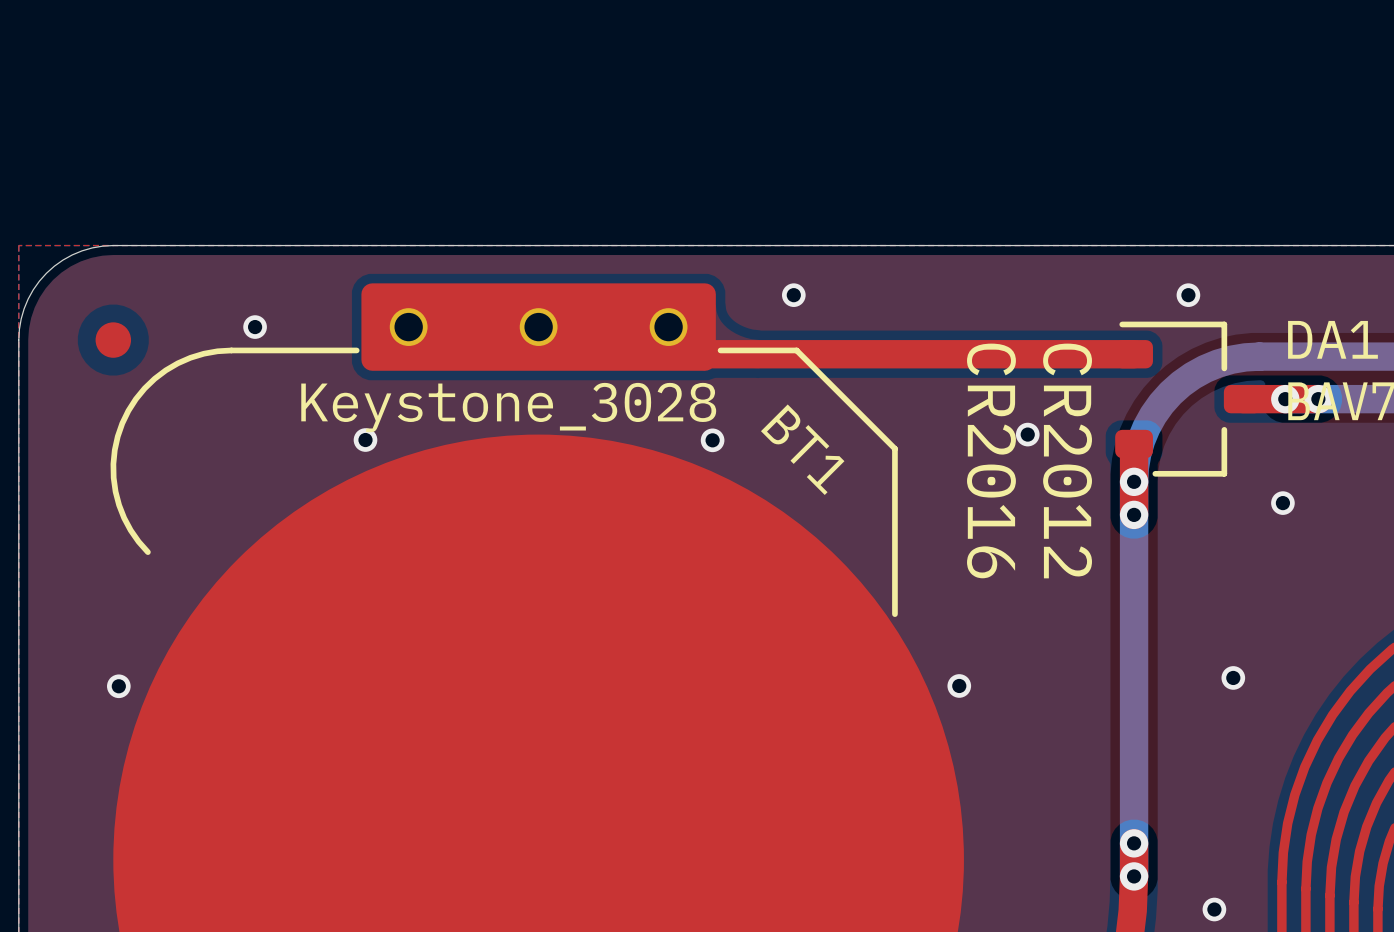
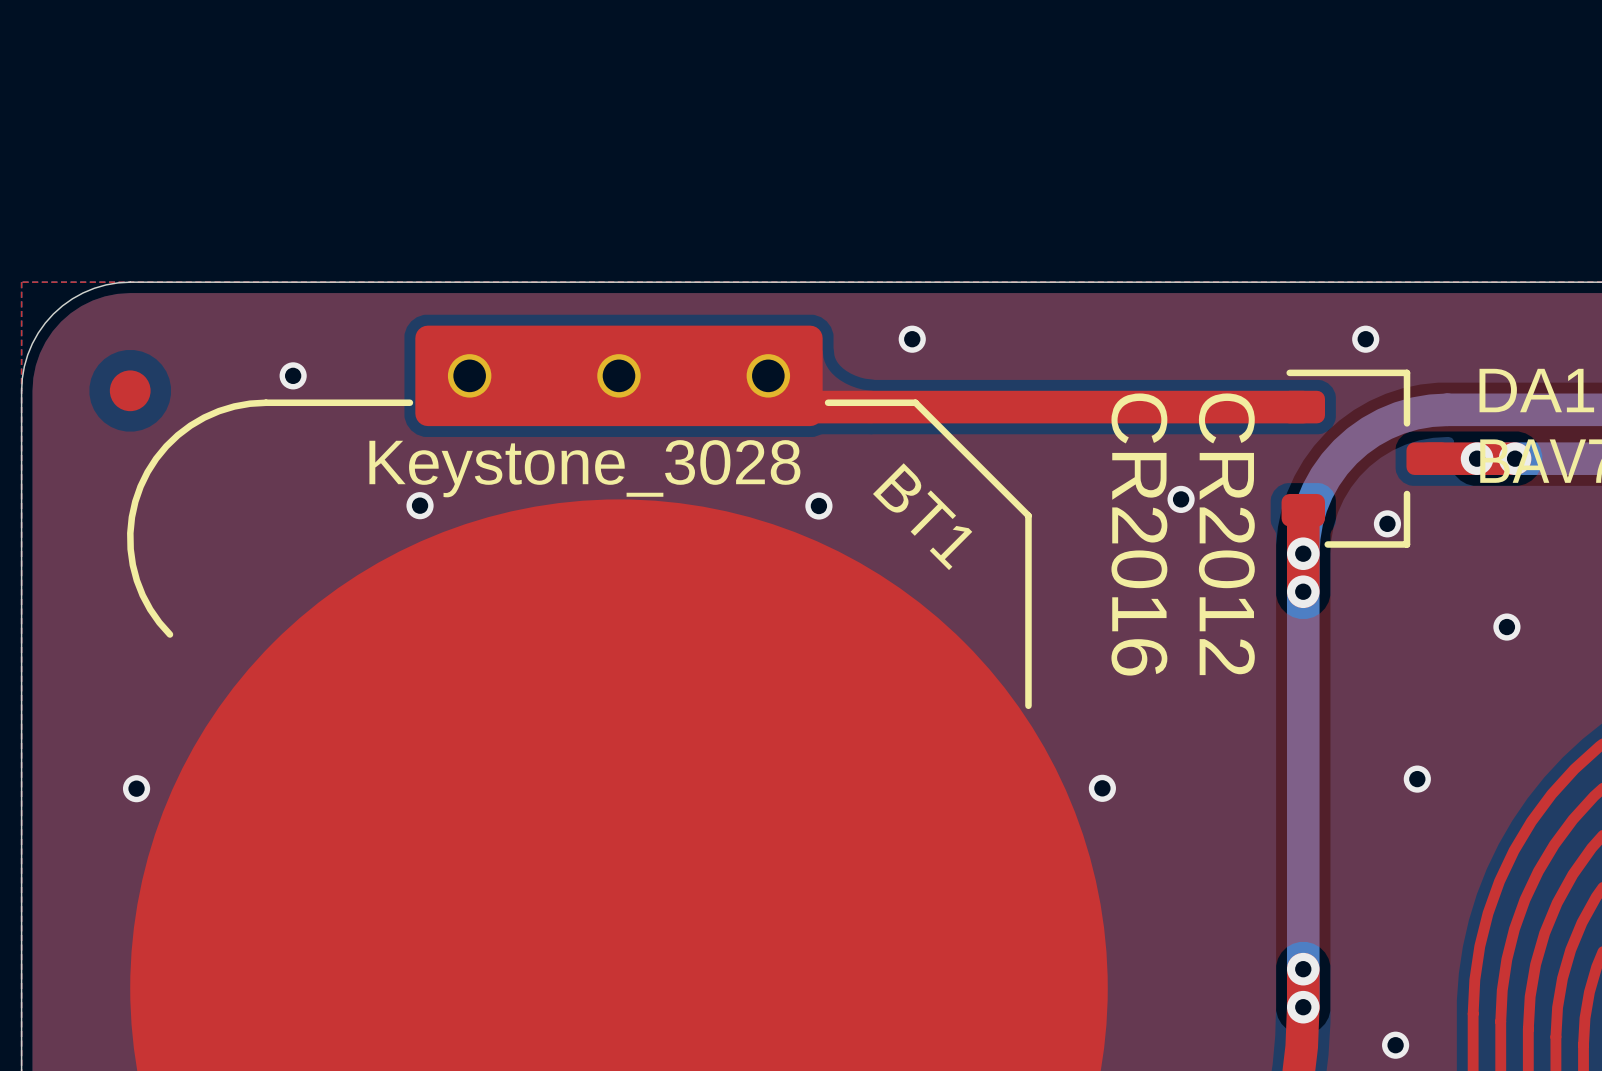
via: none -> (1387, 523)
via: (1282, 503) -> none
via: none -> (1506, 627)

